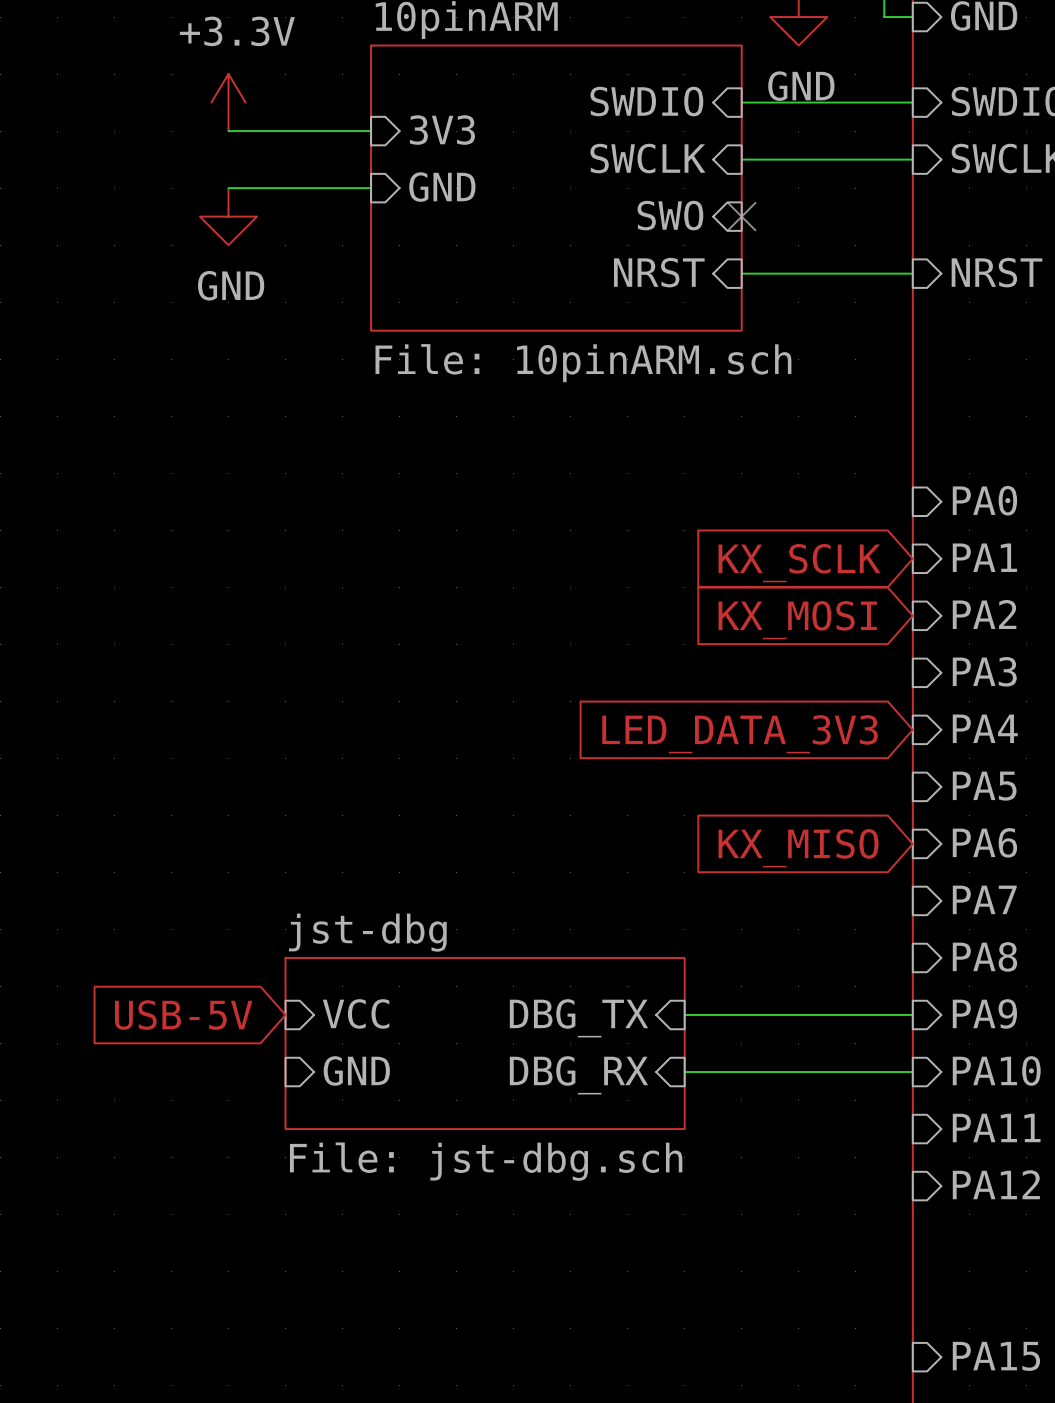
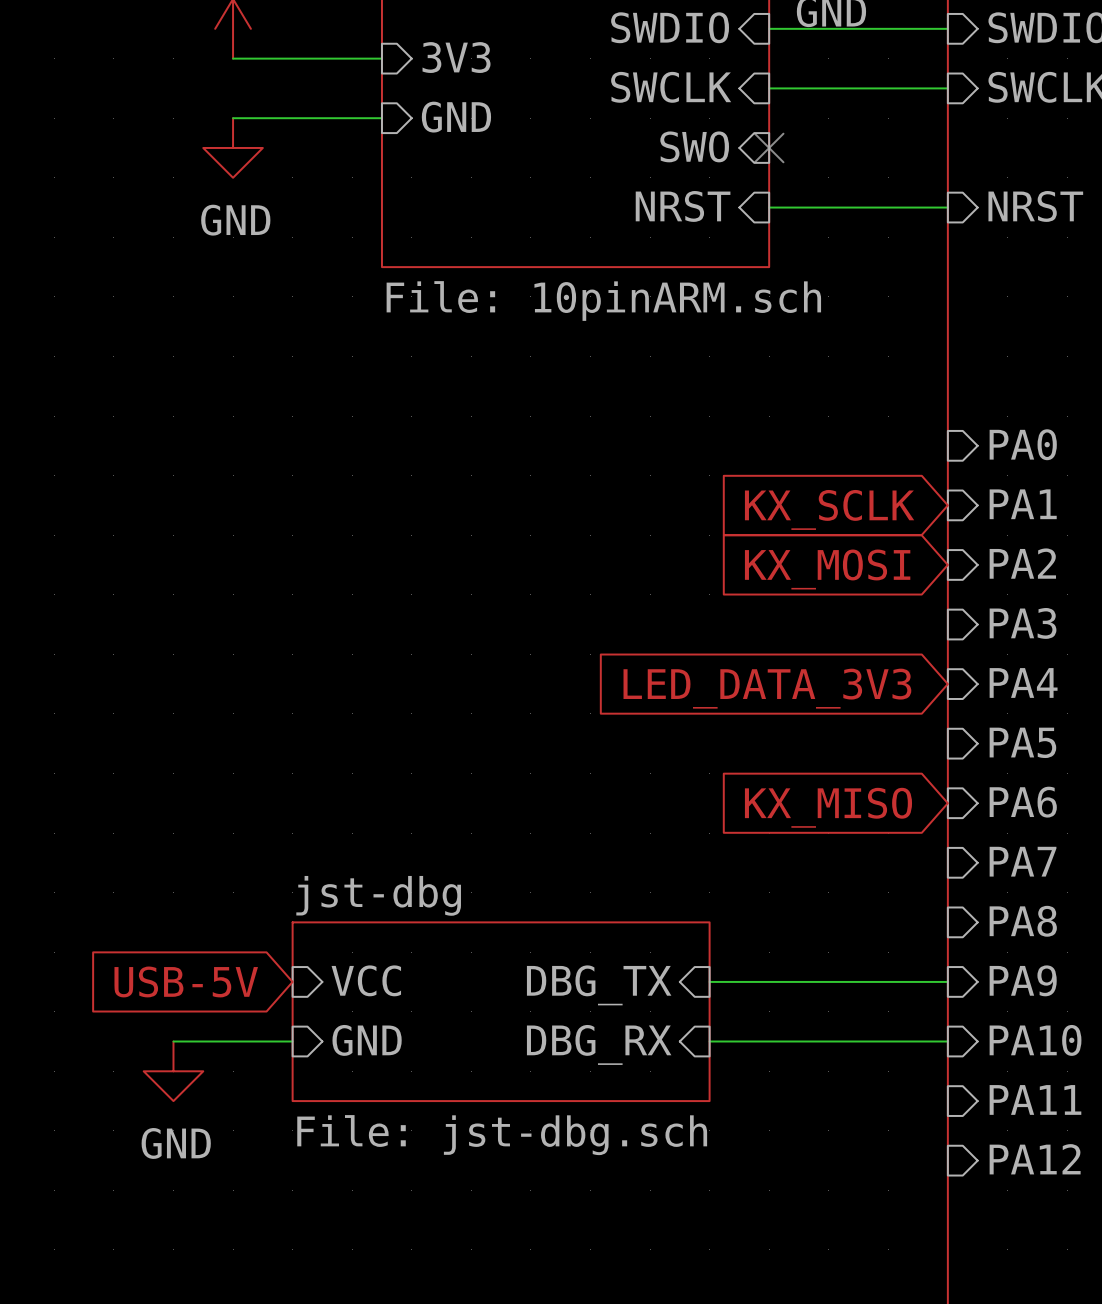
wire: none -> (173, 1041) (292, 1041)
power symbol: none -> GND (173, 1071)

